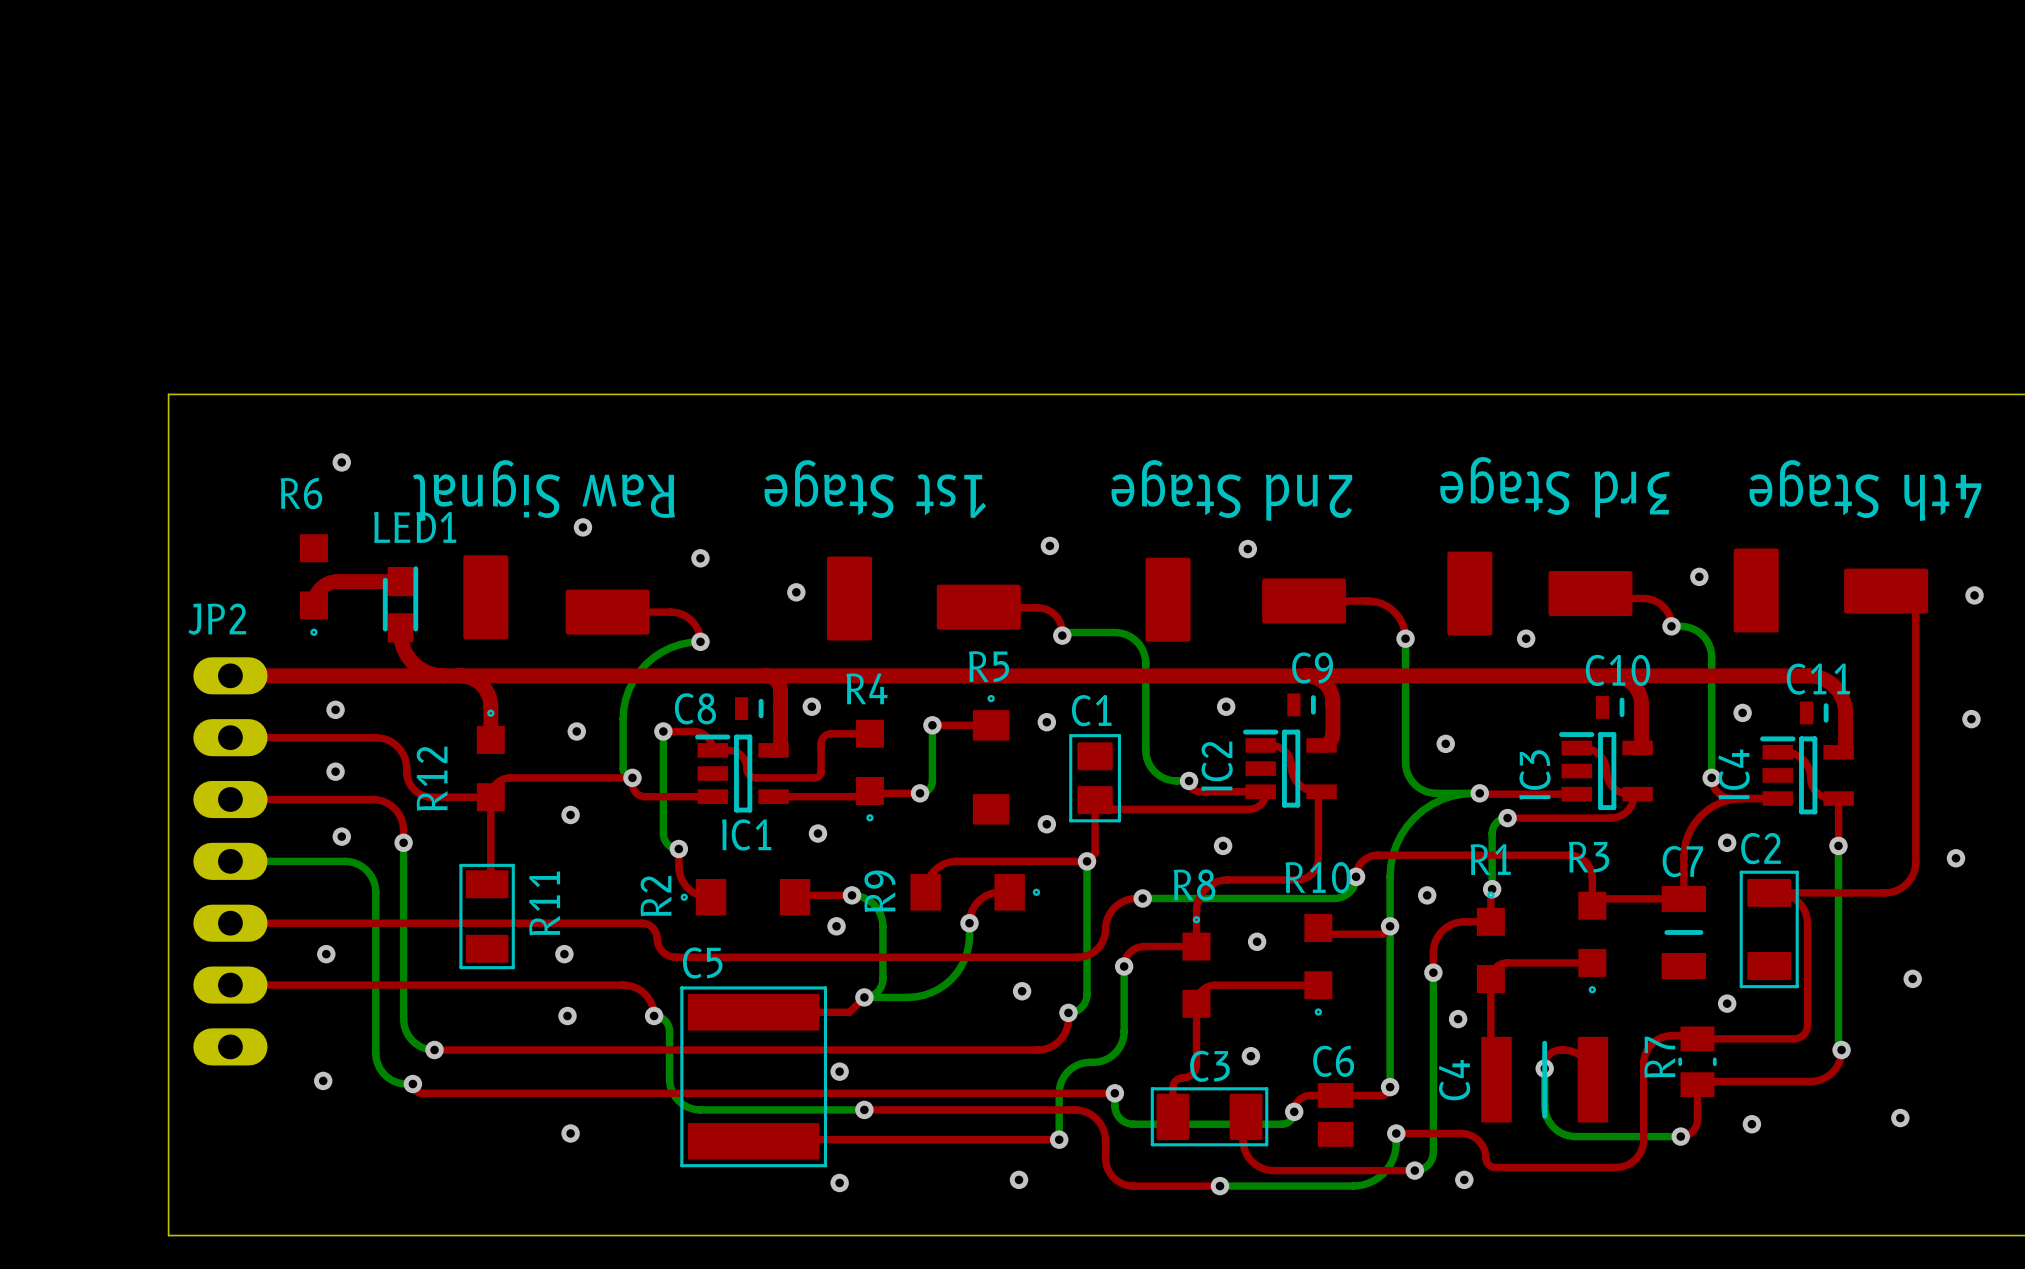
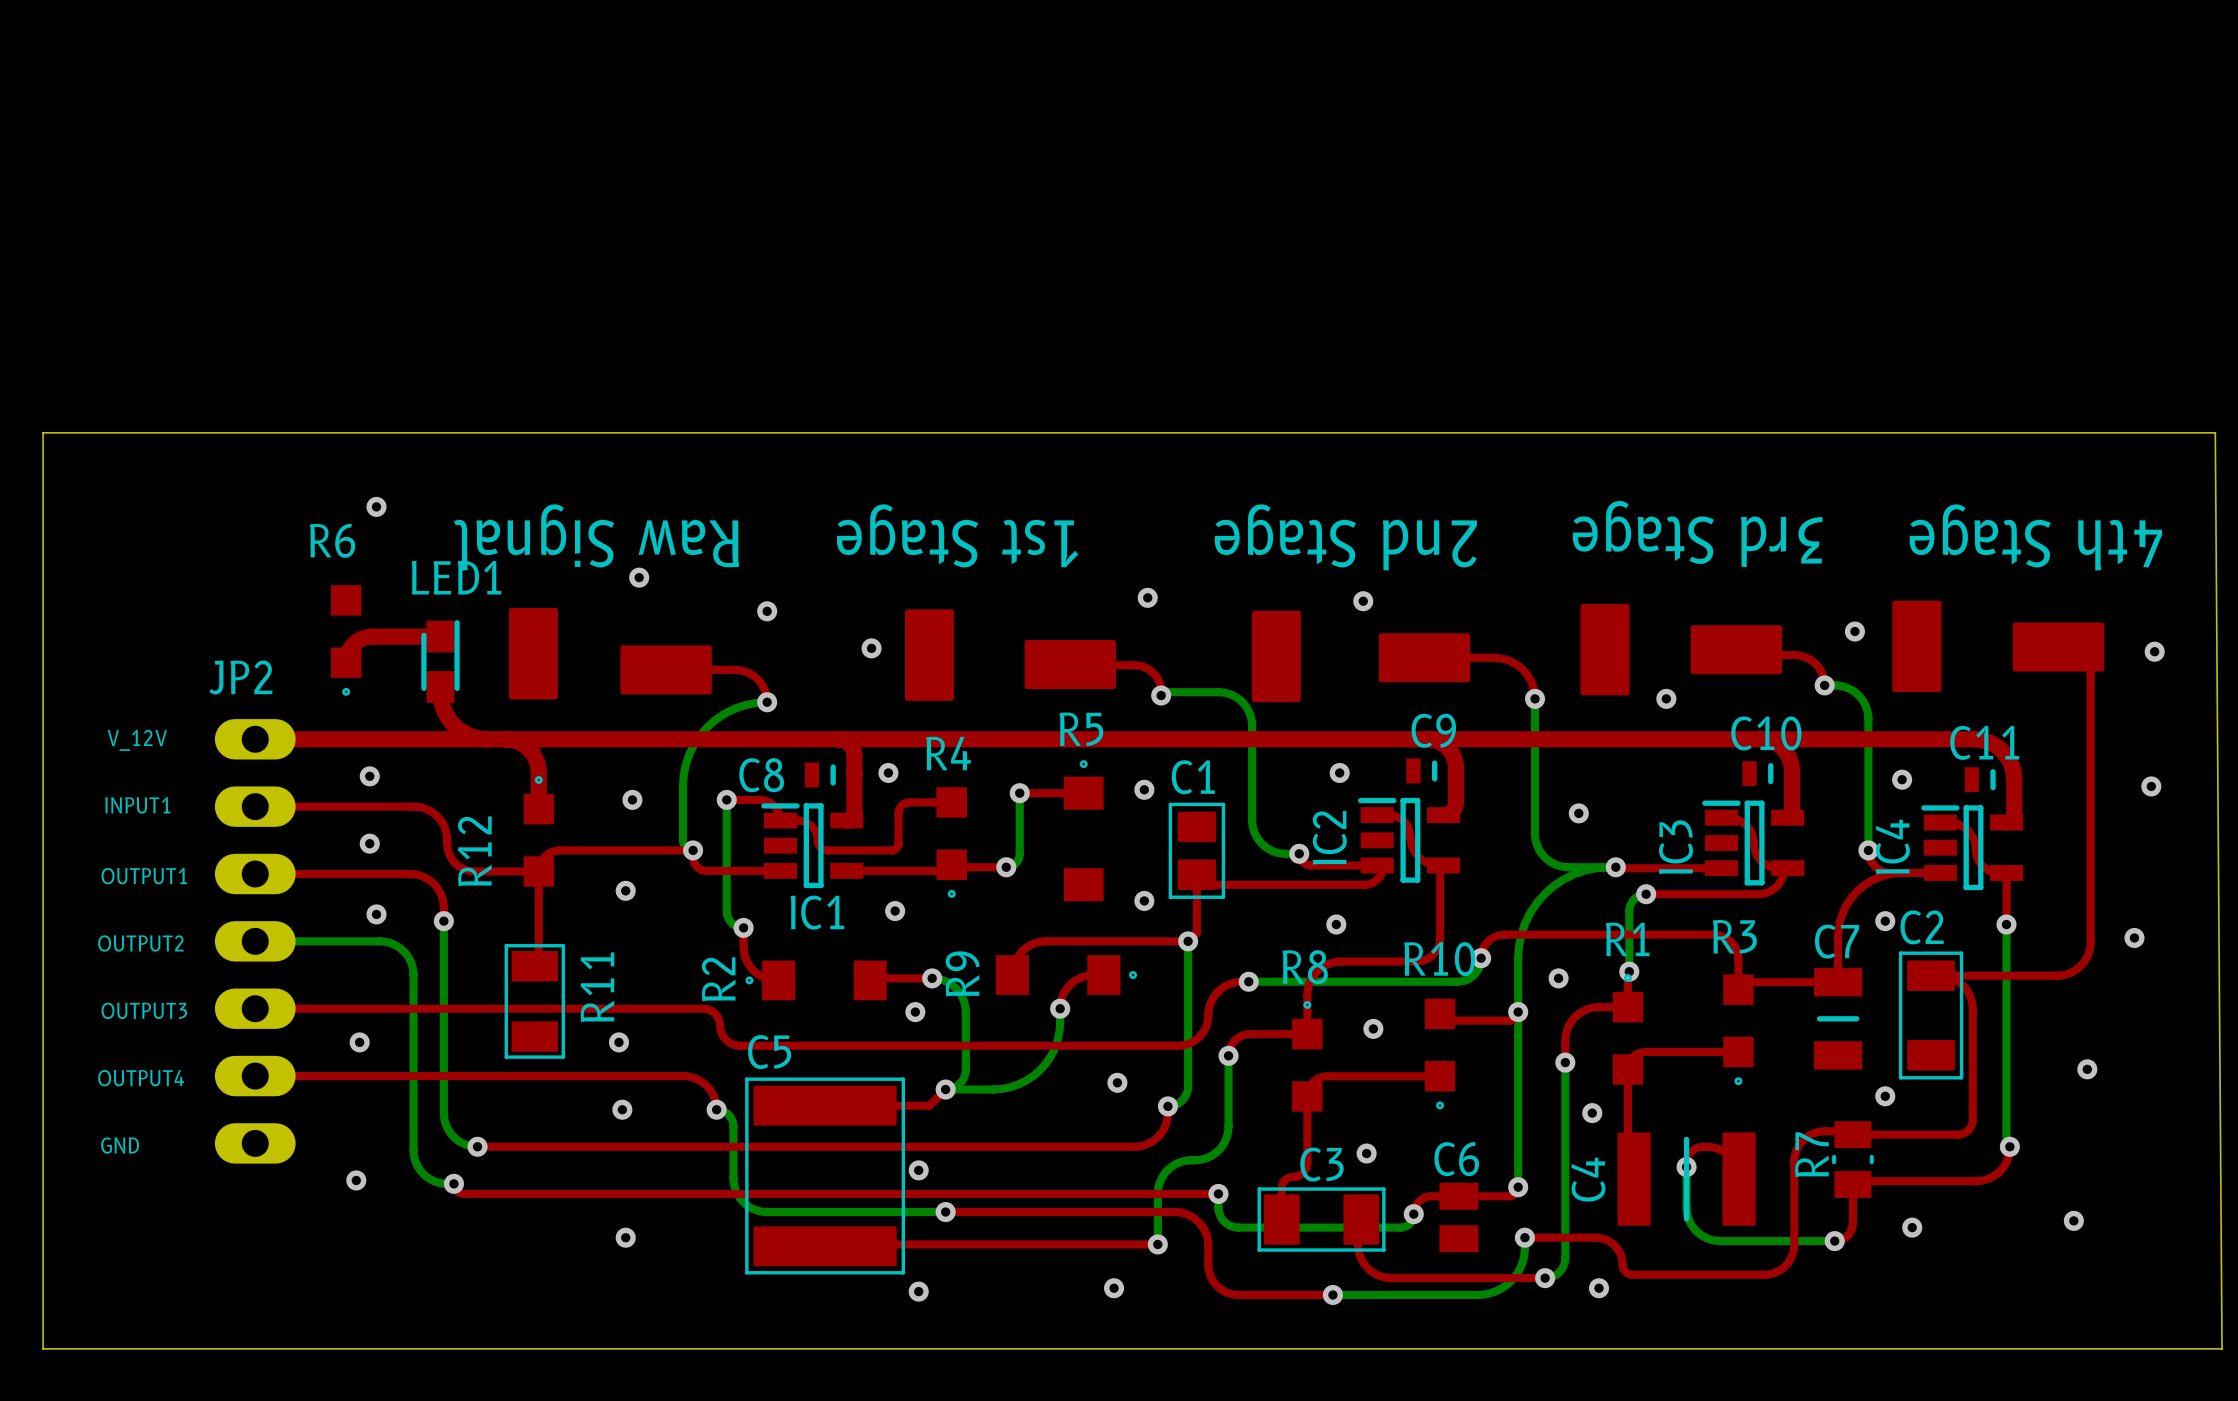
board edge: (168, 394) (168, 1235) -> (187, 432) (43, 432) (43, 1348) (187, 1348)
text: none -> V_12V (137, 740)
text: none -> INPUT1 (137, 805)
text: none -> OUTPUT1 (144, 876)
text: none -> OUTPUT2 (140, 943)
text: none -> OUTPUT3 (144, 1010)
text: none -> OUTPUT4 (141, 1078)
text: none -> GND (120, 1145)

